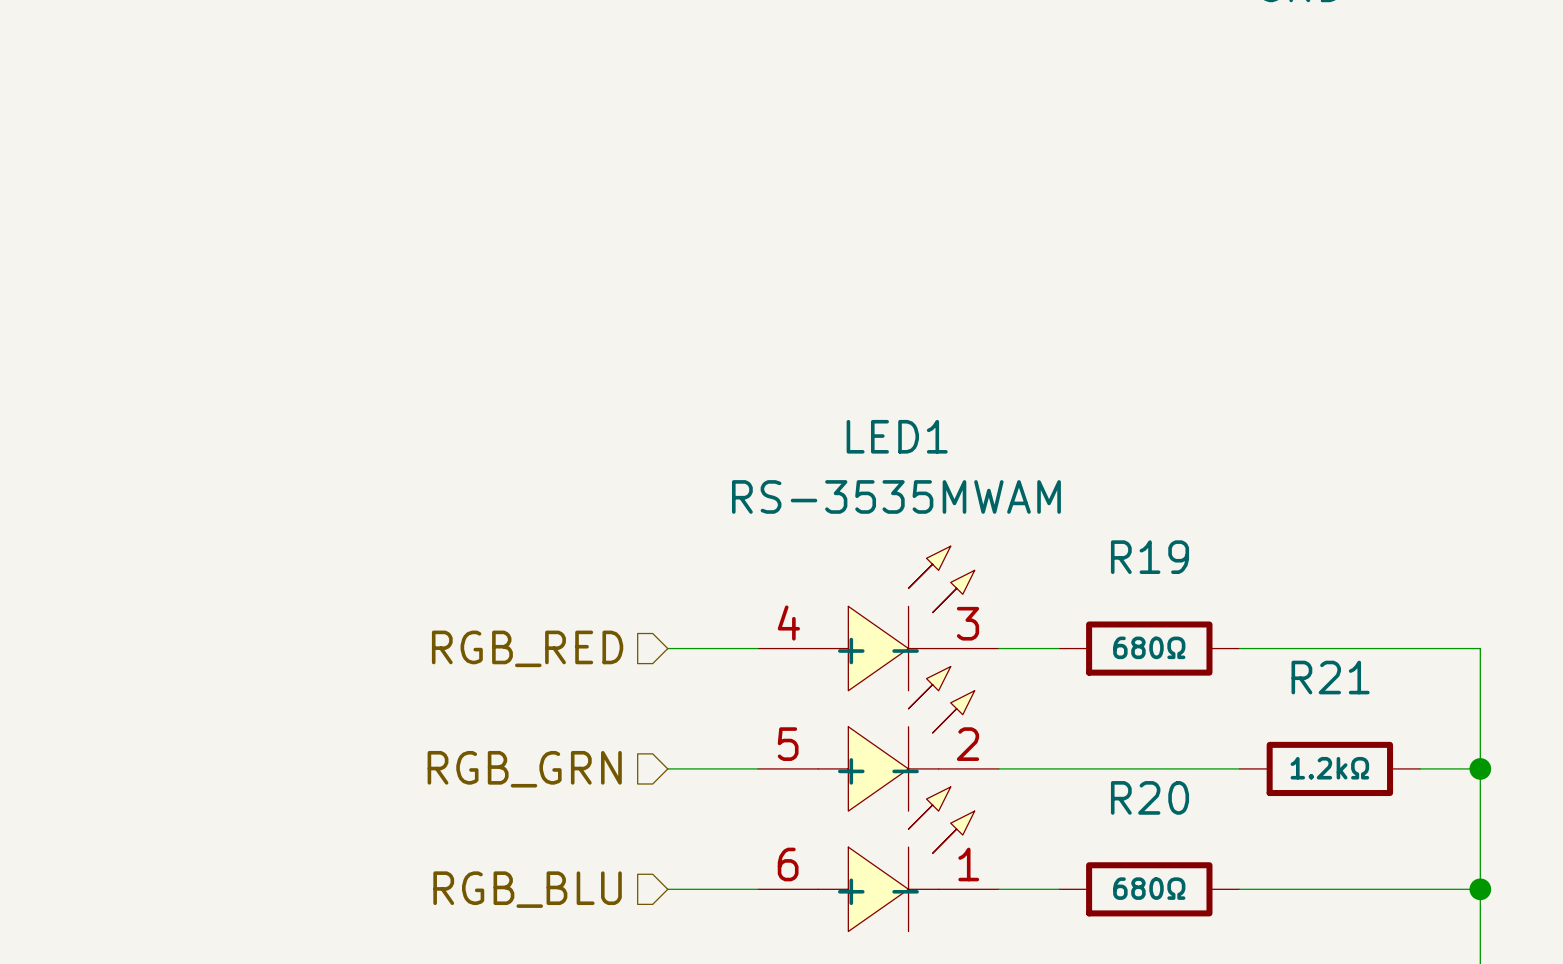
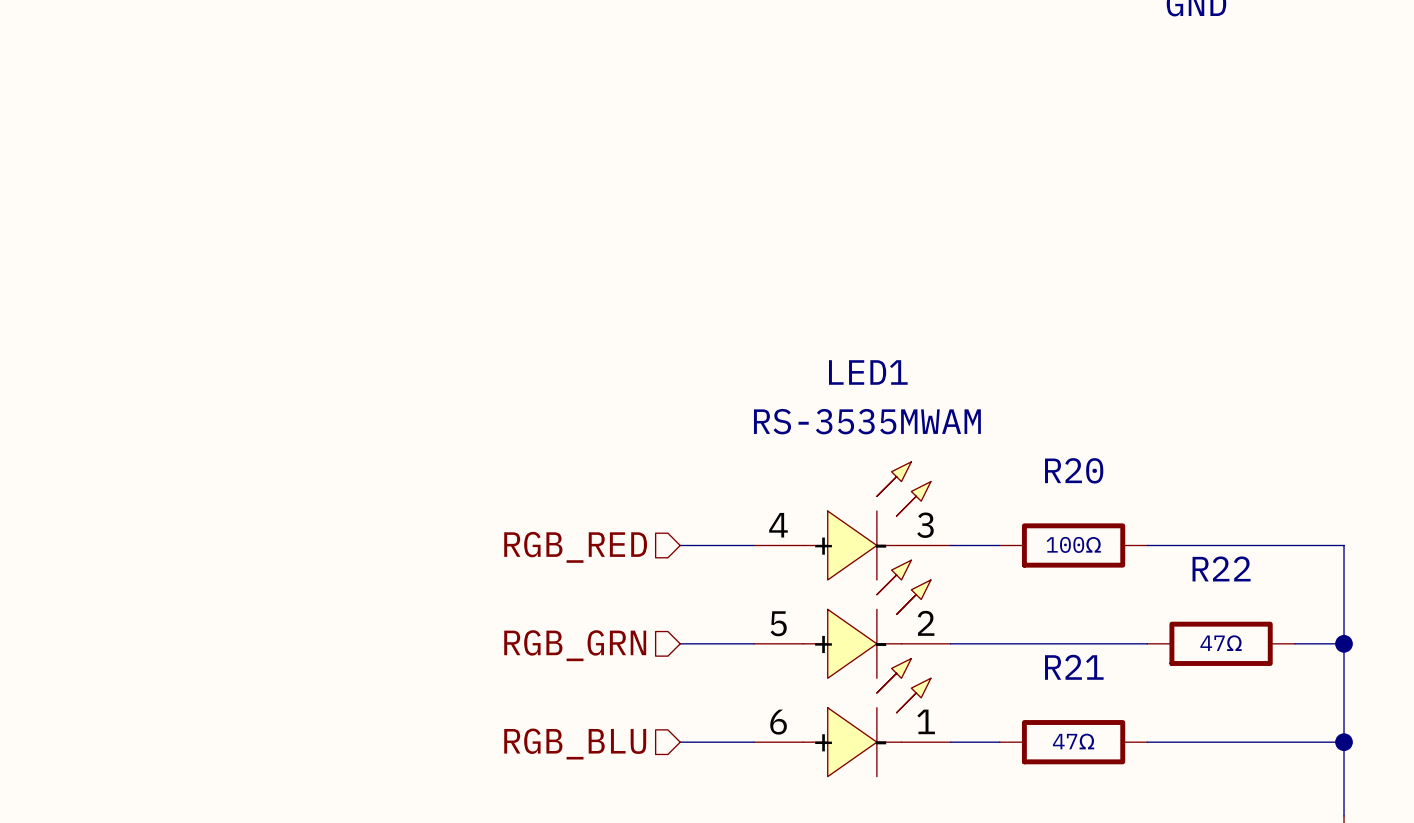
R19 name: R19 (1150, 557) -> R20 (1074, 470)
R19 value: 680Ω (1149, 647) -> 100Ω (1073, 544)
R21 name: R21 (1330, 677) -> R22 (1221, 568)
R21 value: 1.2kΩ (1329, 768) -> 47Ω (1221, 643)
R20 name: R20 (1150, 797) -> R21 (1074, 667)
R20 value: 680Ω (1149, 888) -> 47Ω (1073, 741)

